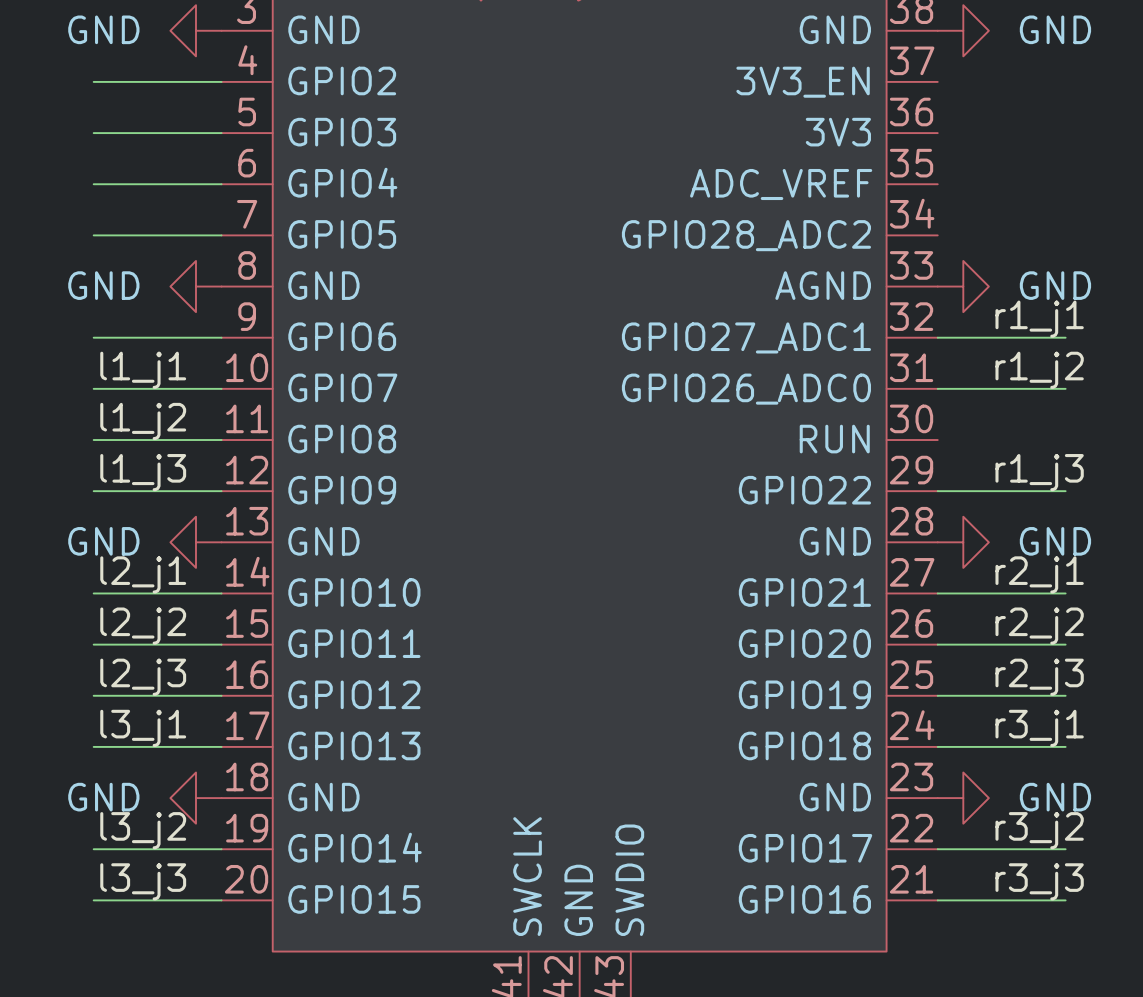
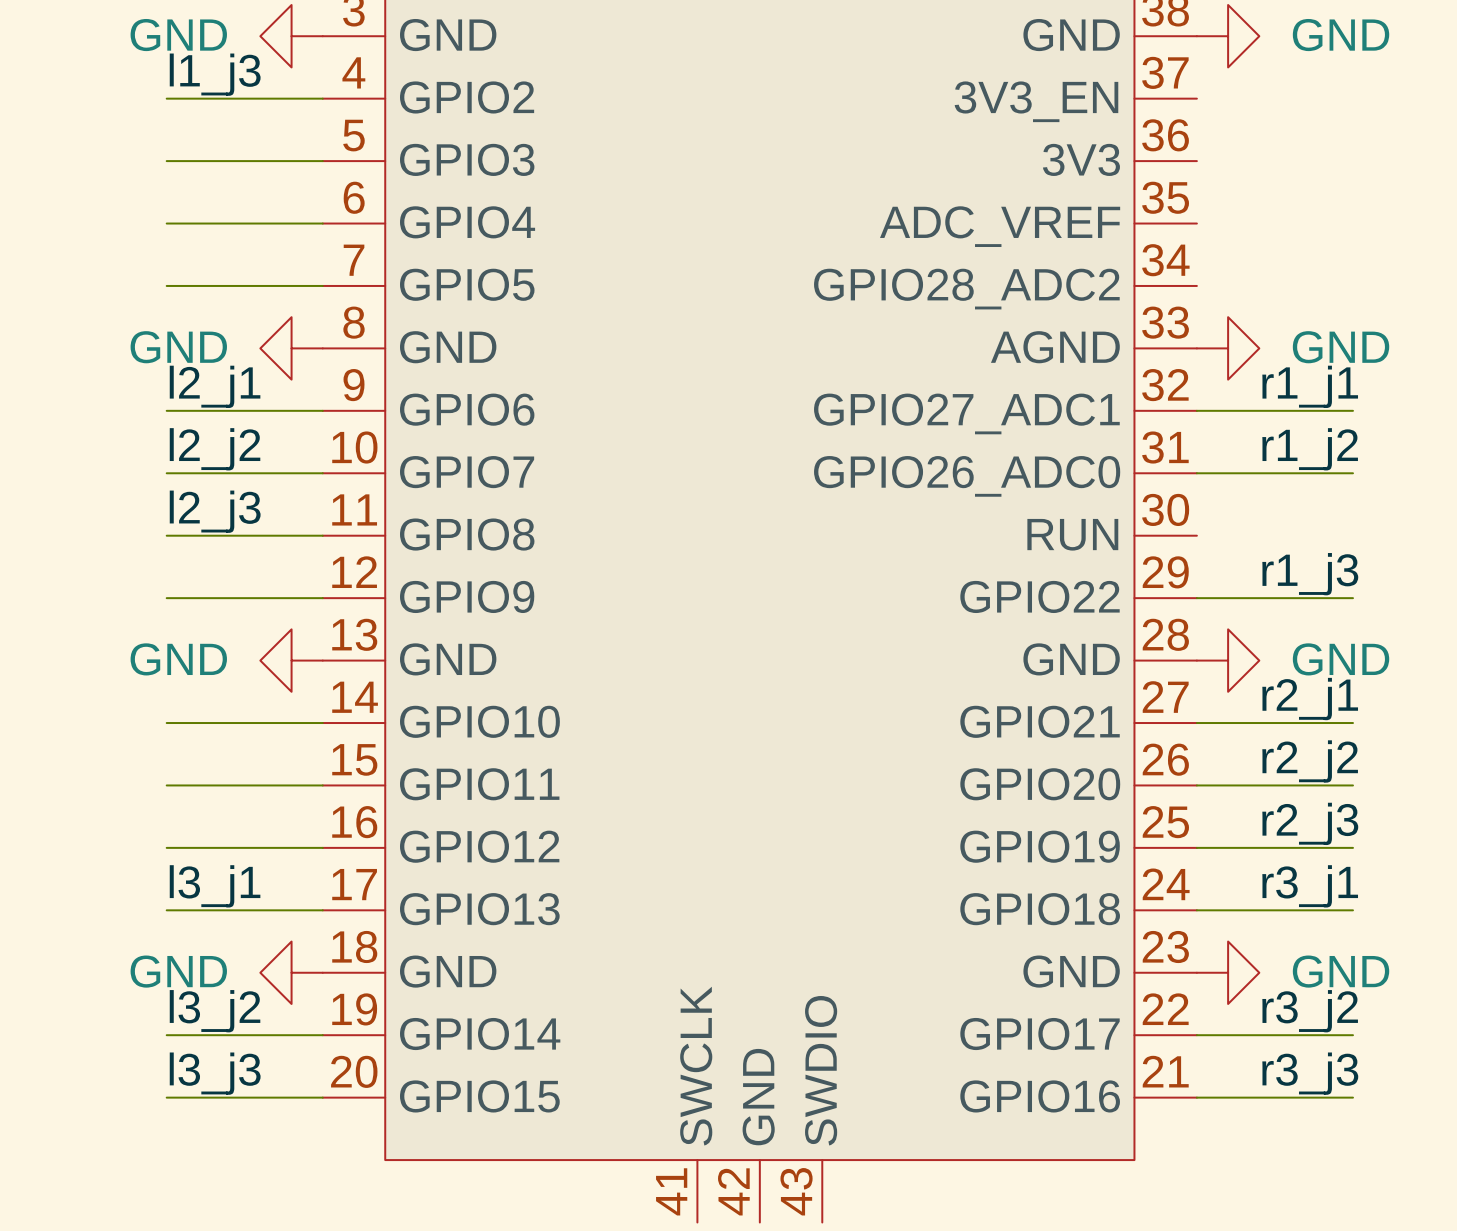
label: l1_j1 (143, 370) -> l2_j2 (215, 449)
label: l1_j2 (143, 421) -> l2_j3 (215, 511)
label position: l1_j3 (143, 472) -> l1_j3 (215, 74)
label position: l2_j1 (143, 574) -> l2_j1 (215, 386)
label: l2_j2 (143, 626) -> none
label: l2_j3 (143, 677) -> none

